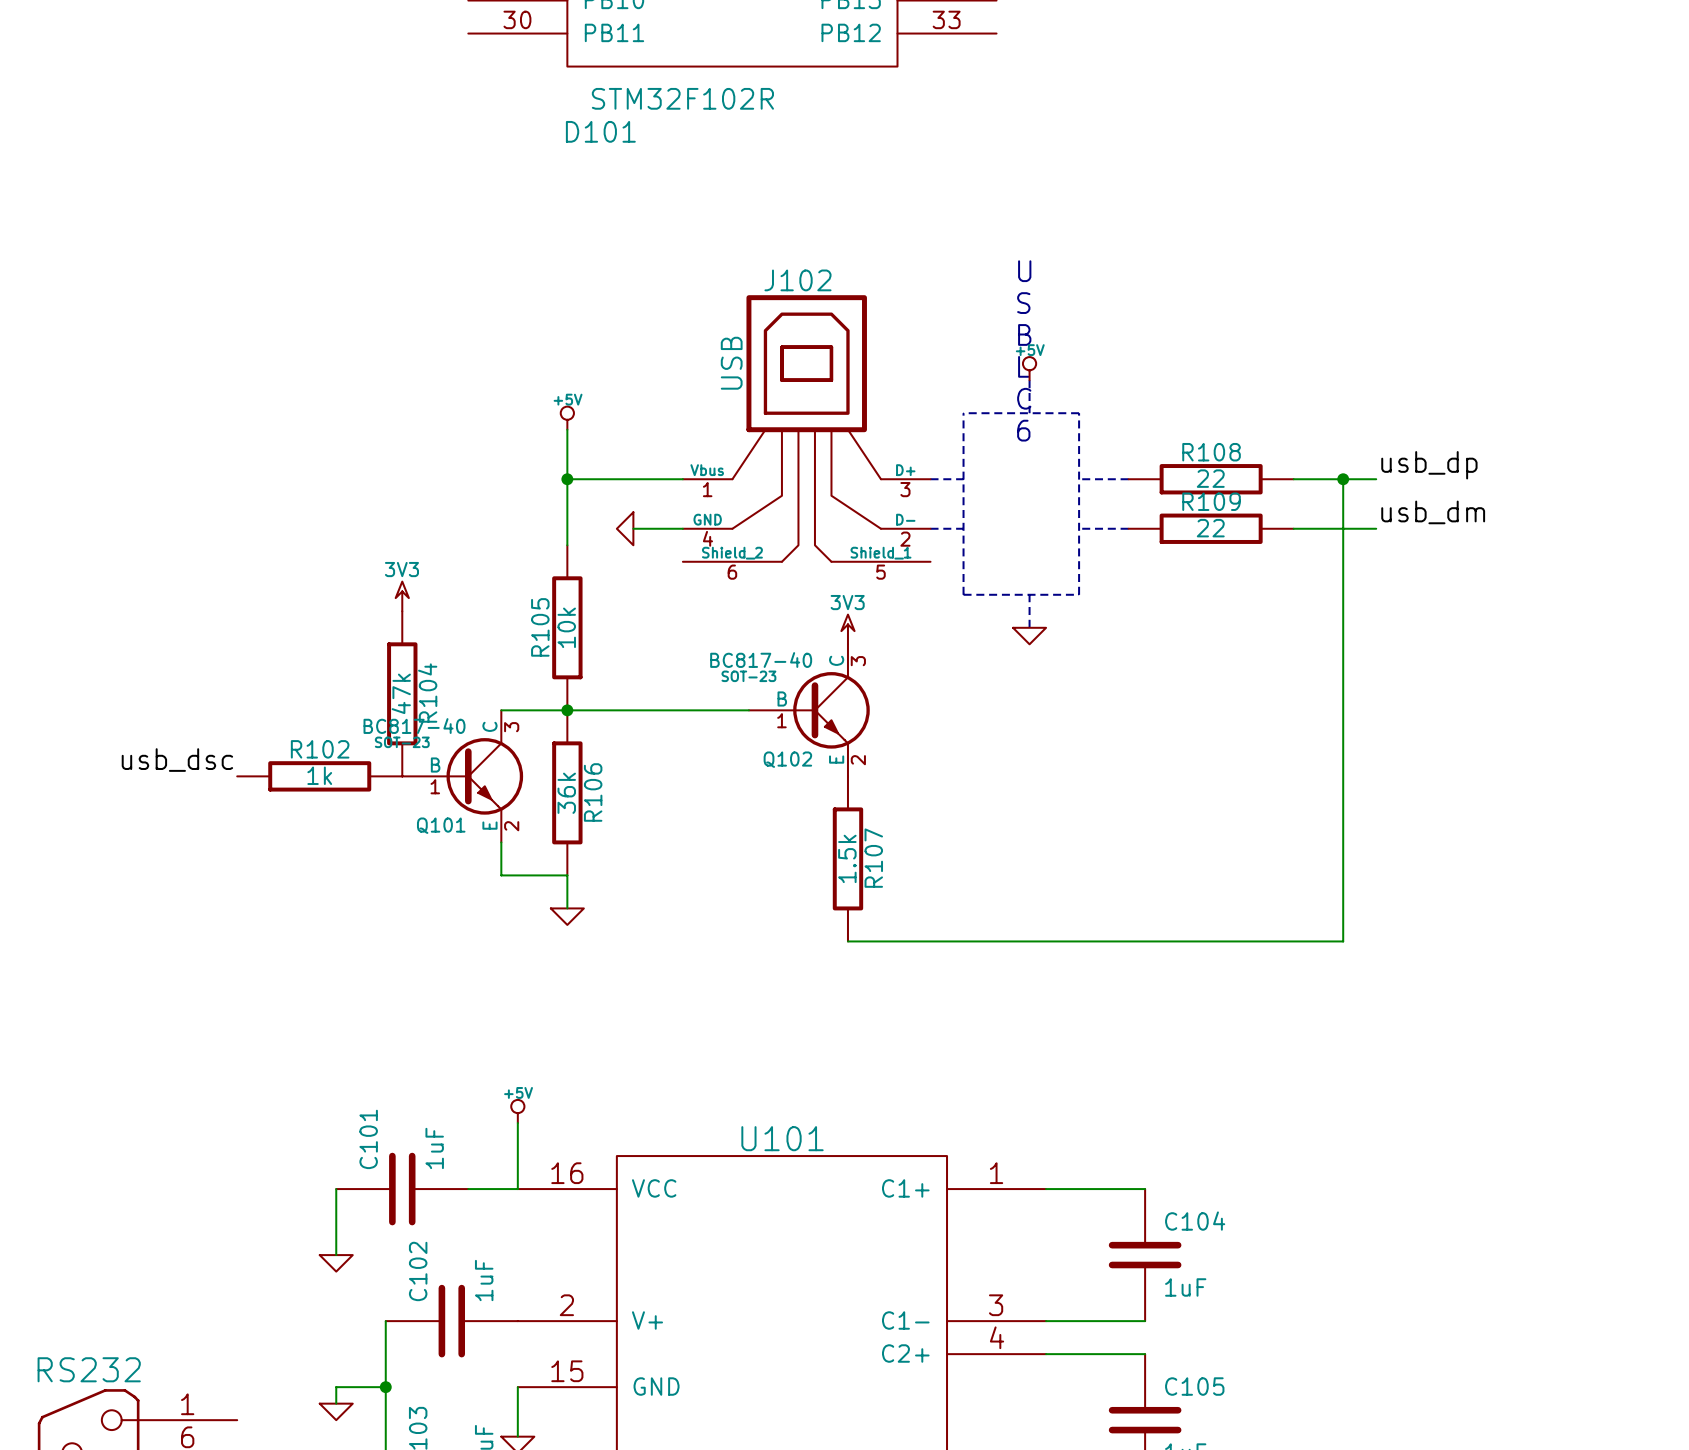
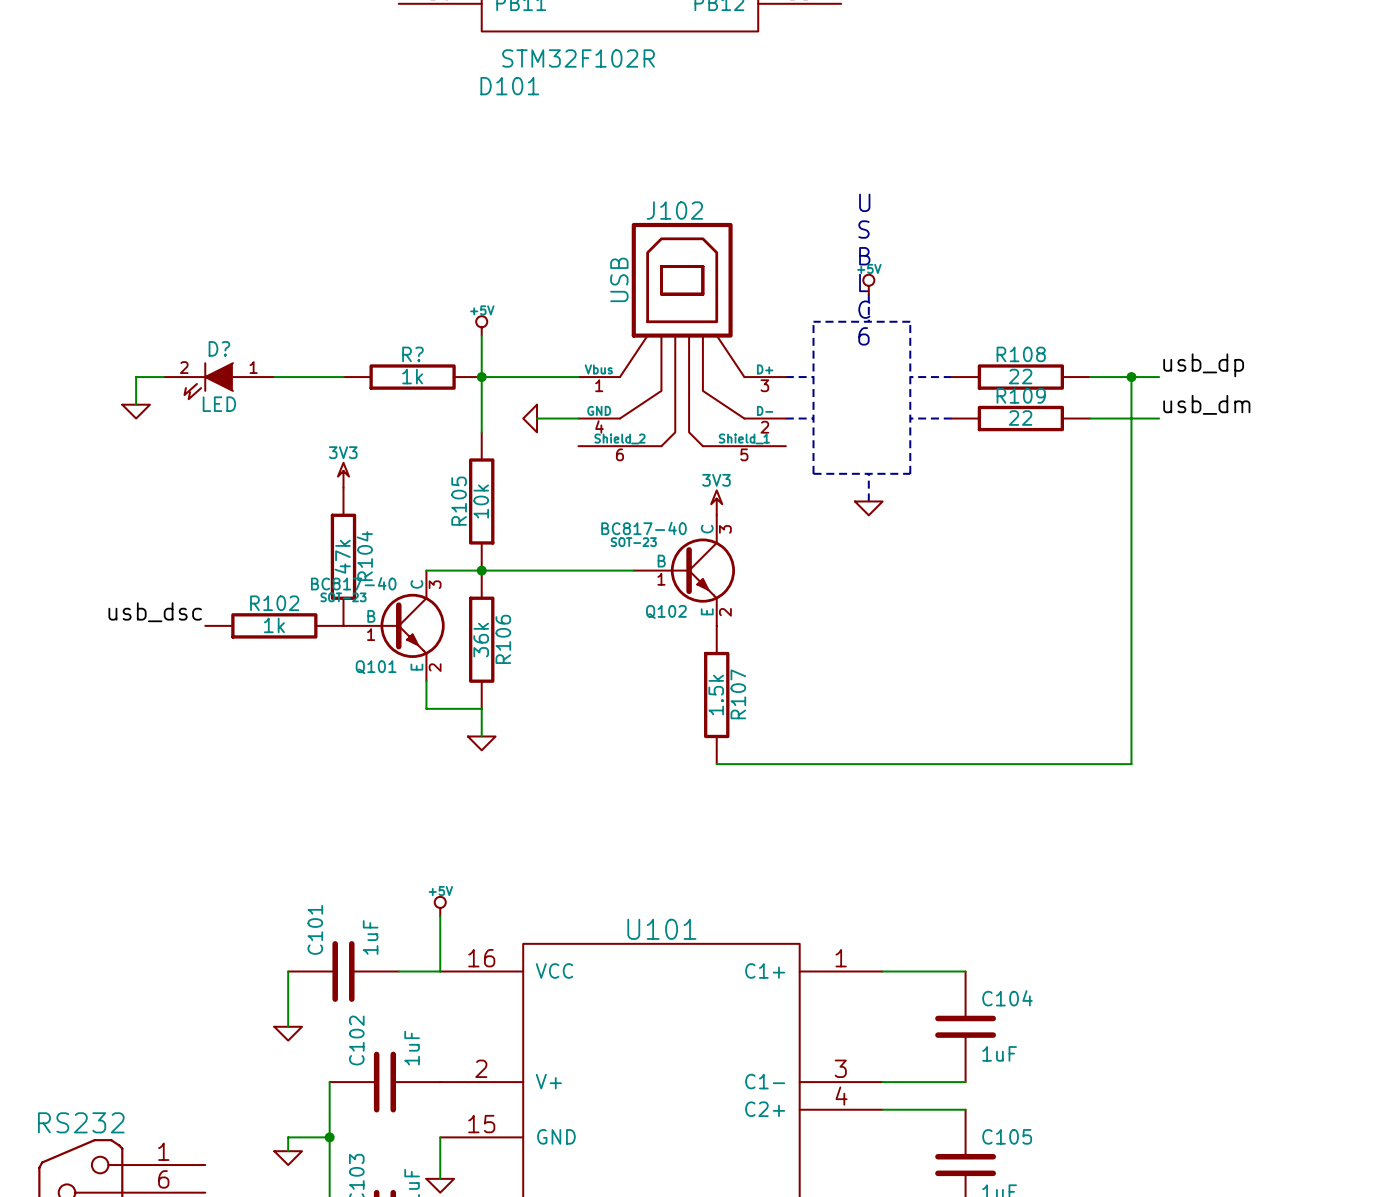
wire: none -> (163, 377) (136, 377) (136, 404)
wire: none -> (274, 377) (343, 377)
R?: none -> 1k (412, 377)
D?: none -> LED (219, 381)
power symbol: none -> (136, 411)

